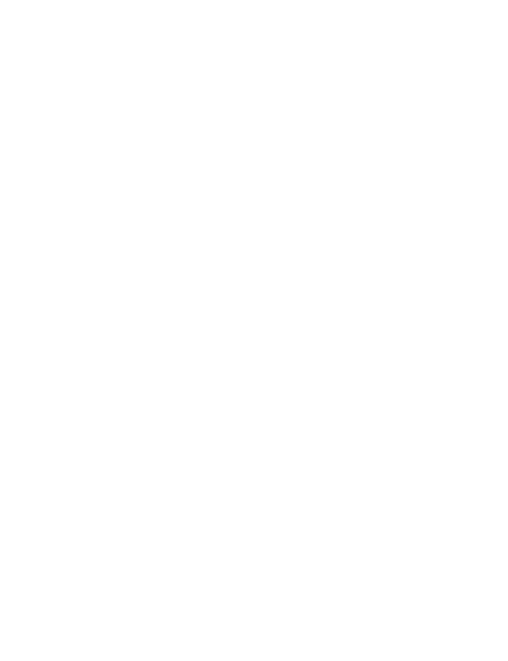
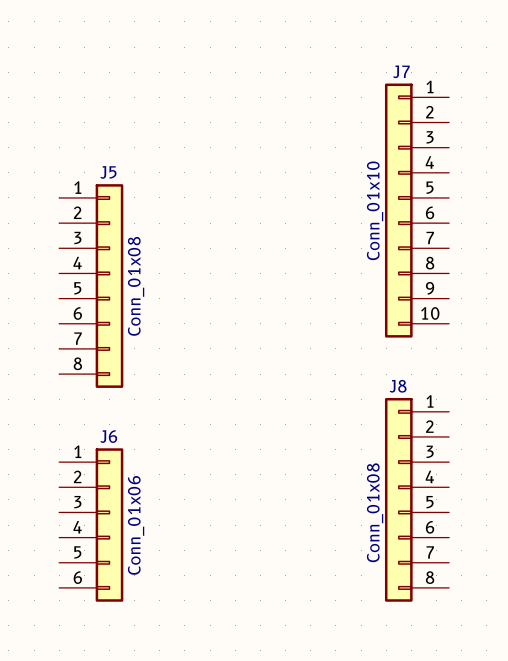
J7: none -> Conn_01x10 (417, 210)
J5: none -> Conn_01x08 (91, 286)
J8: none -> Conn_01x08 (417, 499)
J6: none -> Conn_01x06 (91, 525)

